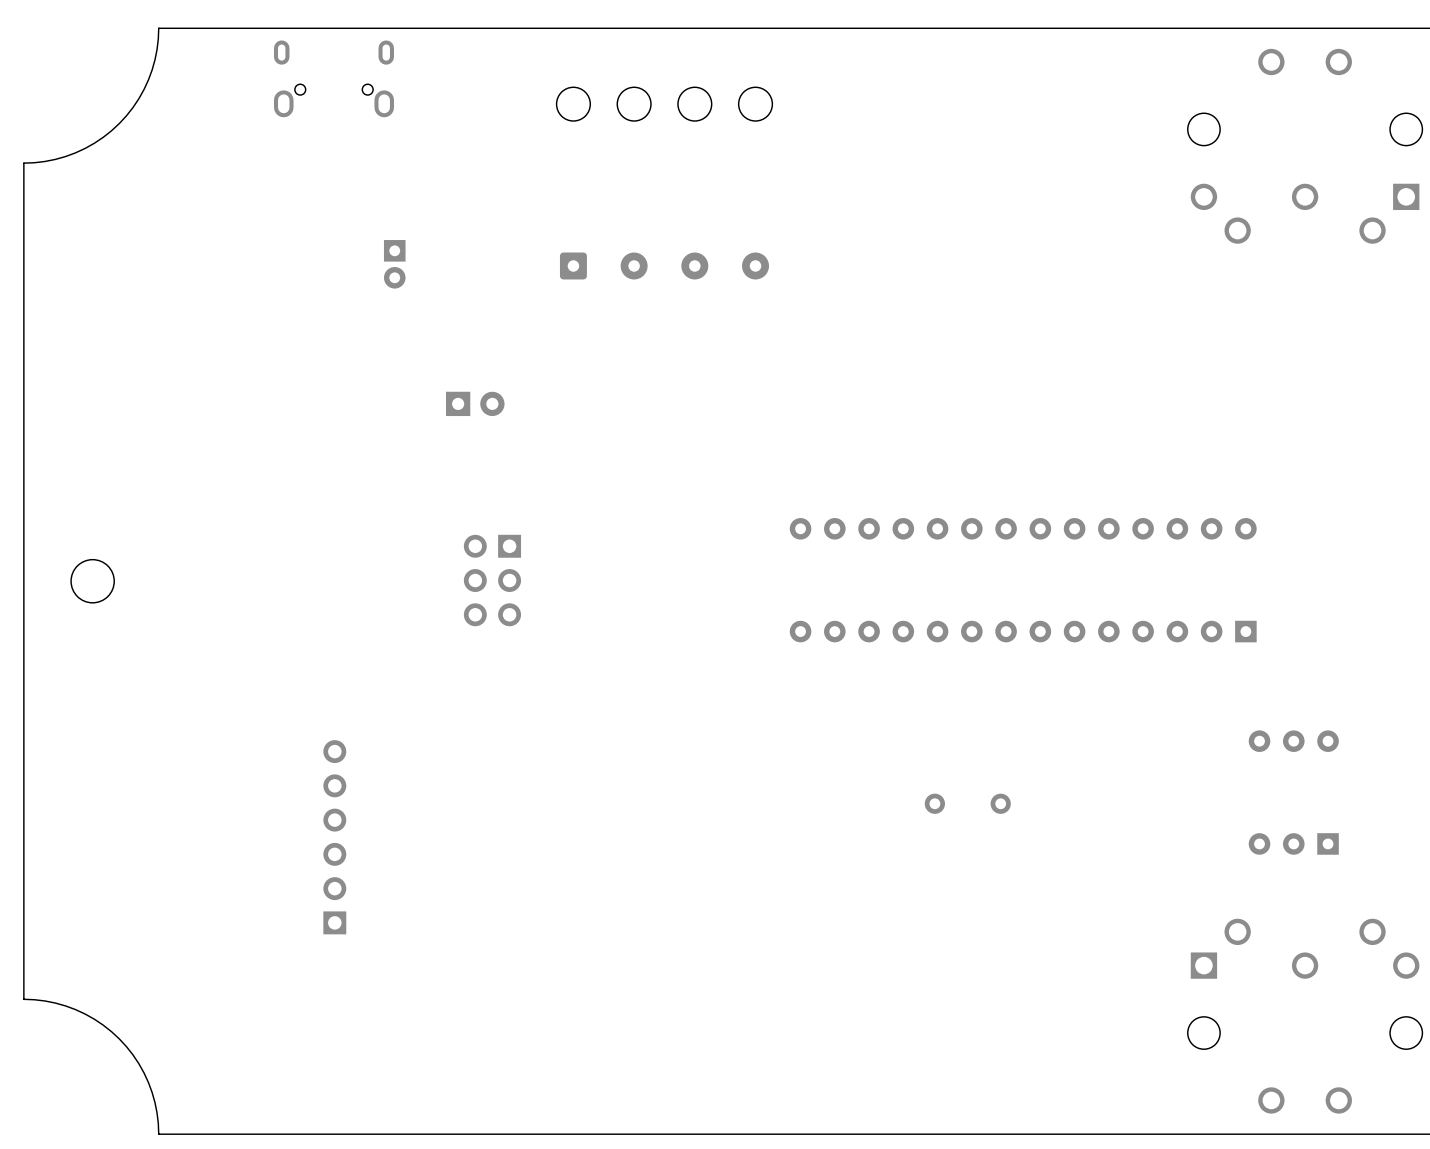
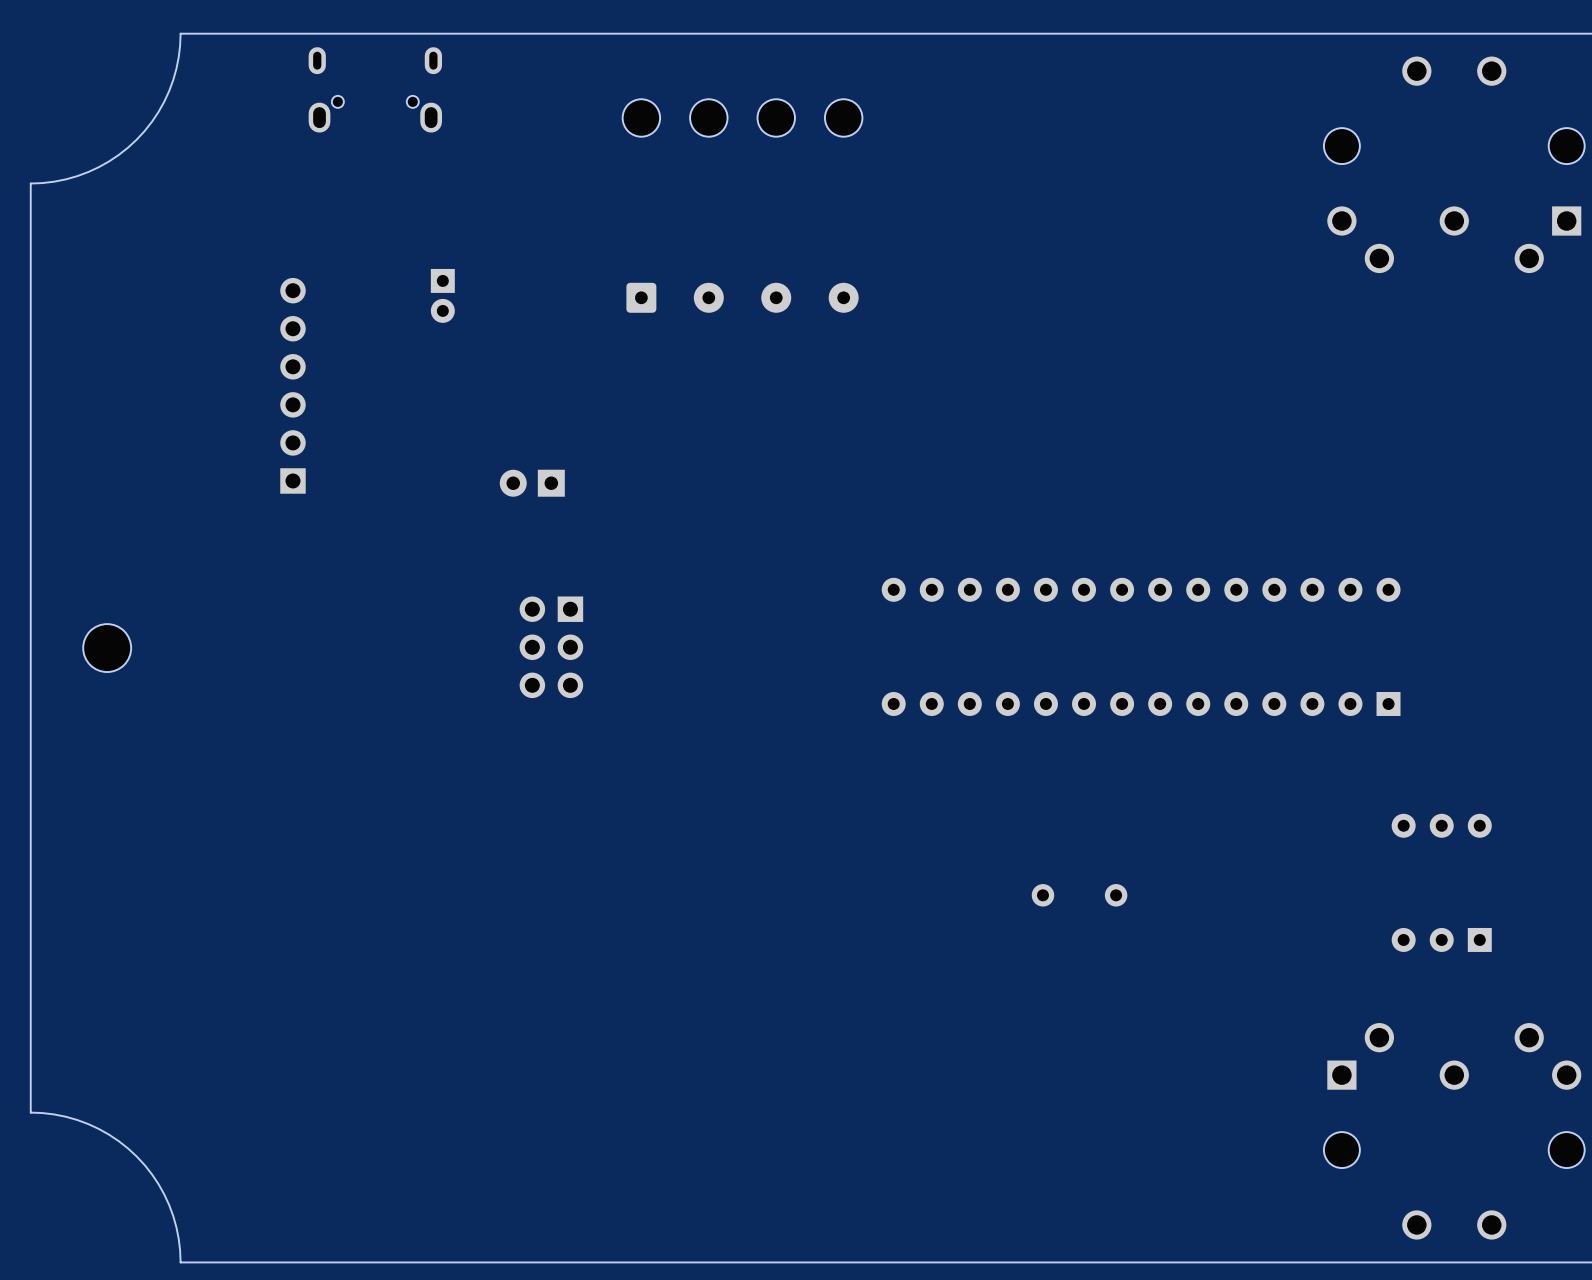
part: none -> (292, 385)
part rotation: 0° (475, 403) -> 180° (532, 483)
part: (334, 837) -> none

